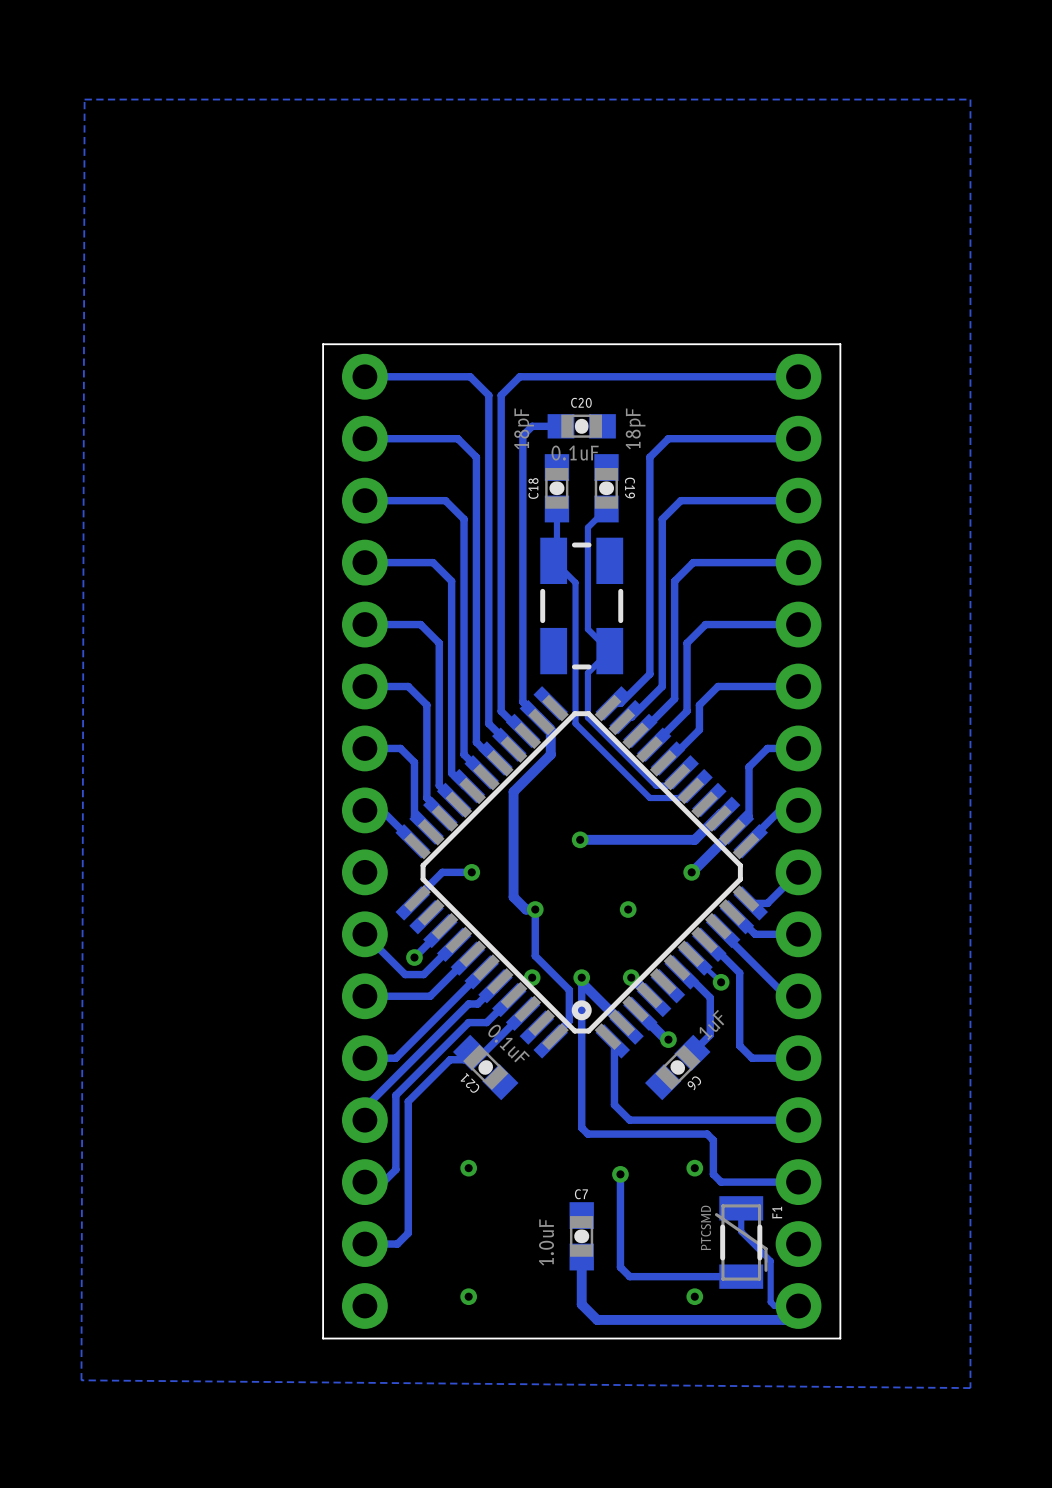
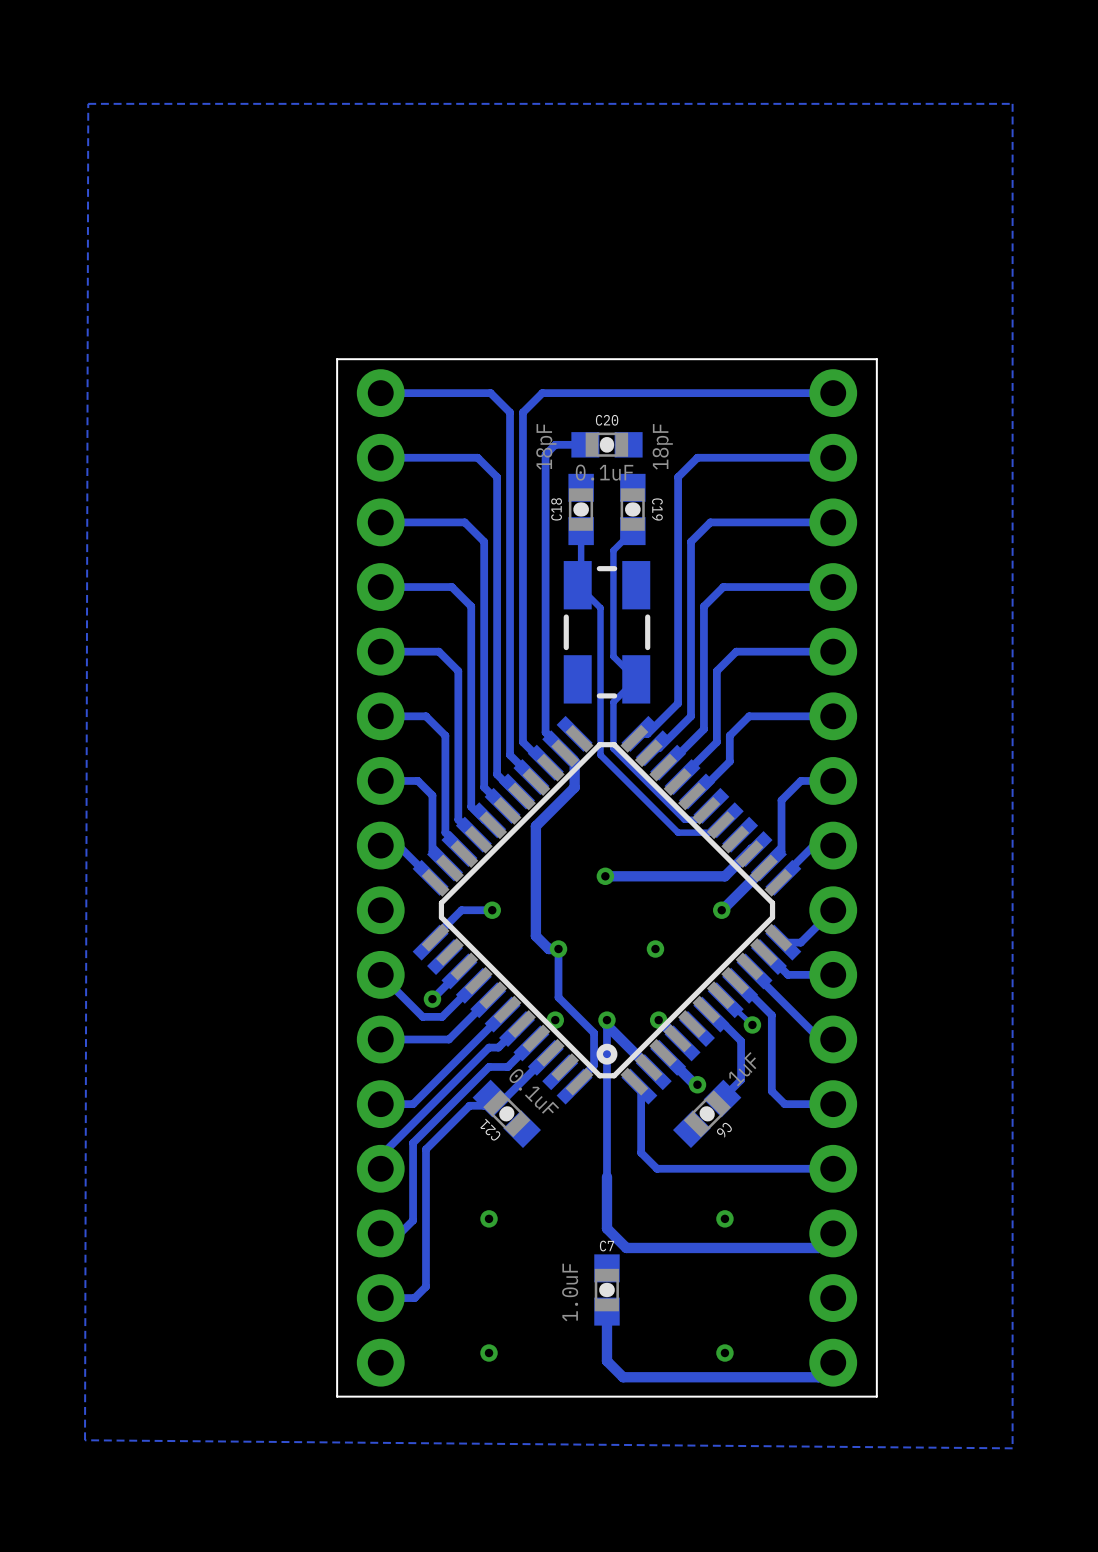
track: (581, 1127) (587, 1134) (707, 1134) (713, 1140) (713, 1174) (721, 1182) (798, 1182) -> (606, 1176) (606, 1228) (626, 1247) (818, 1247) (833, 1233)
track: (620, 1174) (620, 1267) (629, 1276) (741, 1276) -> none
via: (620, 1174) -> none
track: (741, 1208) (741, 1231) (770, 1261) (770, 1302) (774, 1306) (798, 1306) -> none
F1: PTCSMD (741, 1242) -> none

